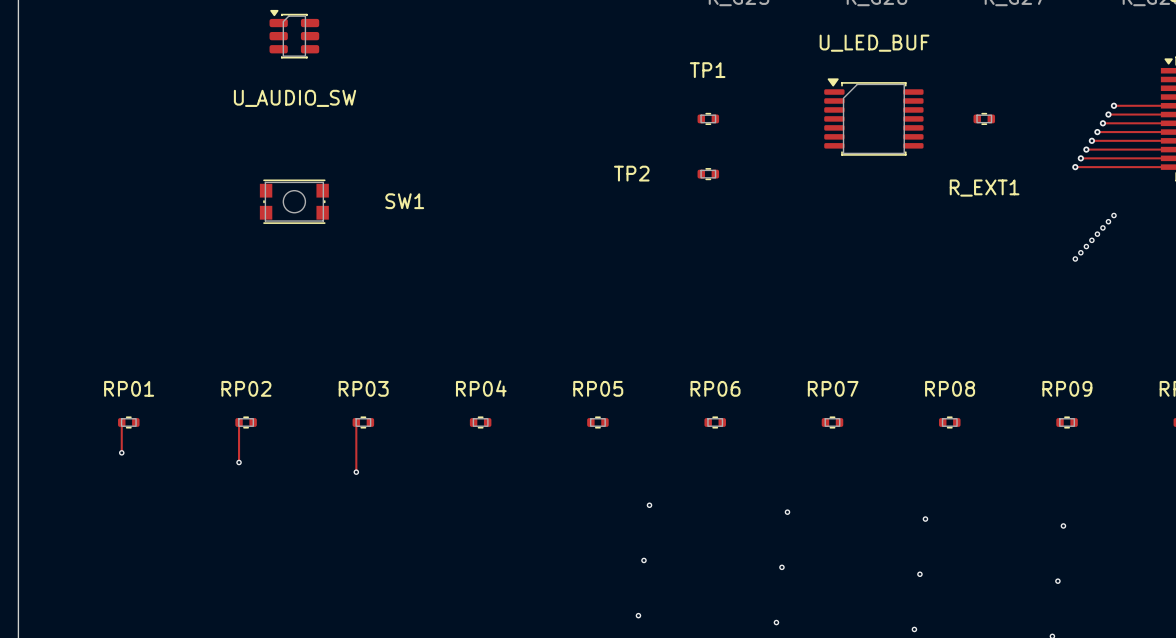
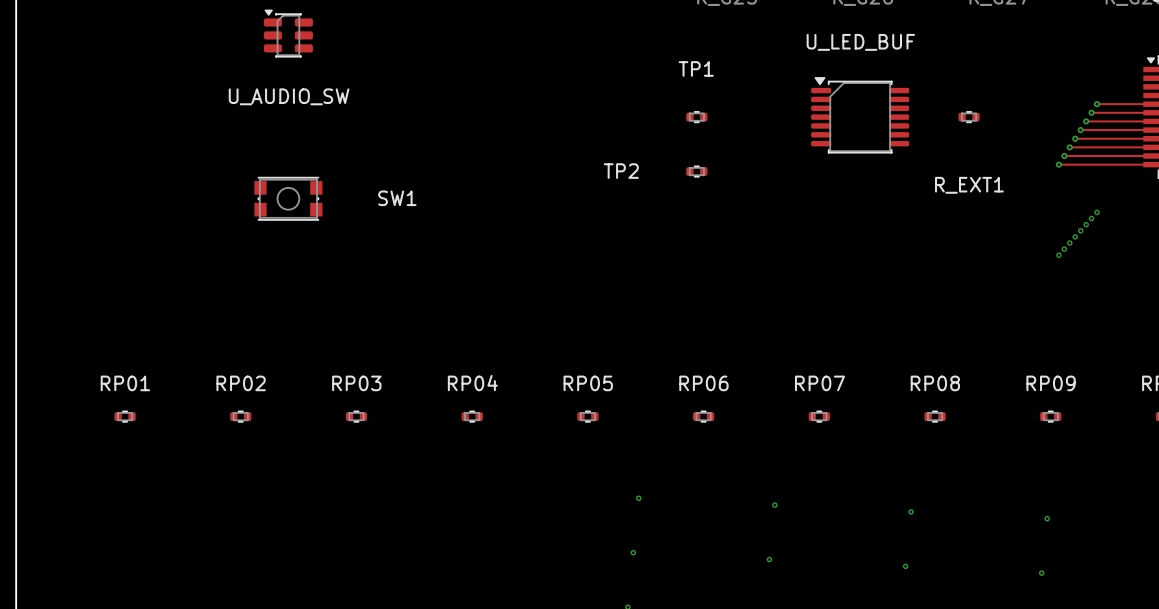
track: (121, 422) (121, 452) -> none
track: (239, 422) (239, 462) -> none
track: (356, 422) (356, 472) -> none
via: (121, 452) -> none
via: (239, 462) -> none
via: (356, 472) -> none

